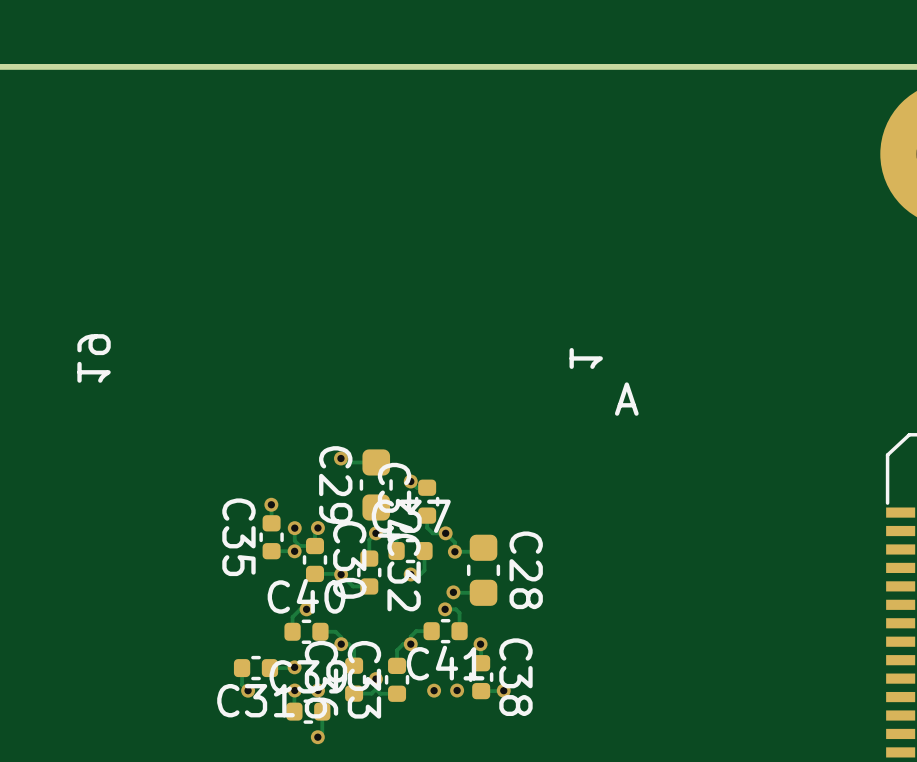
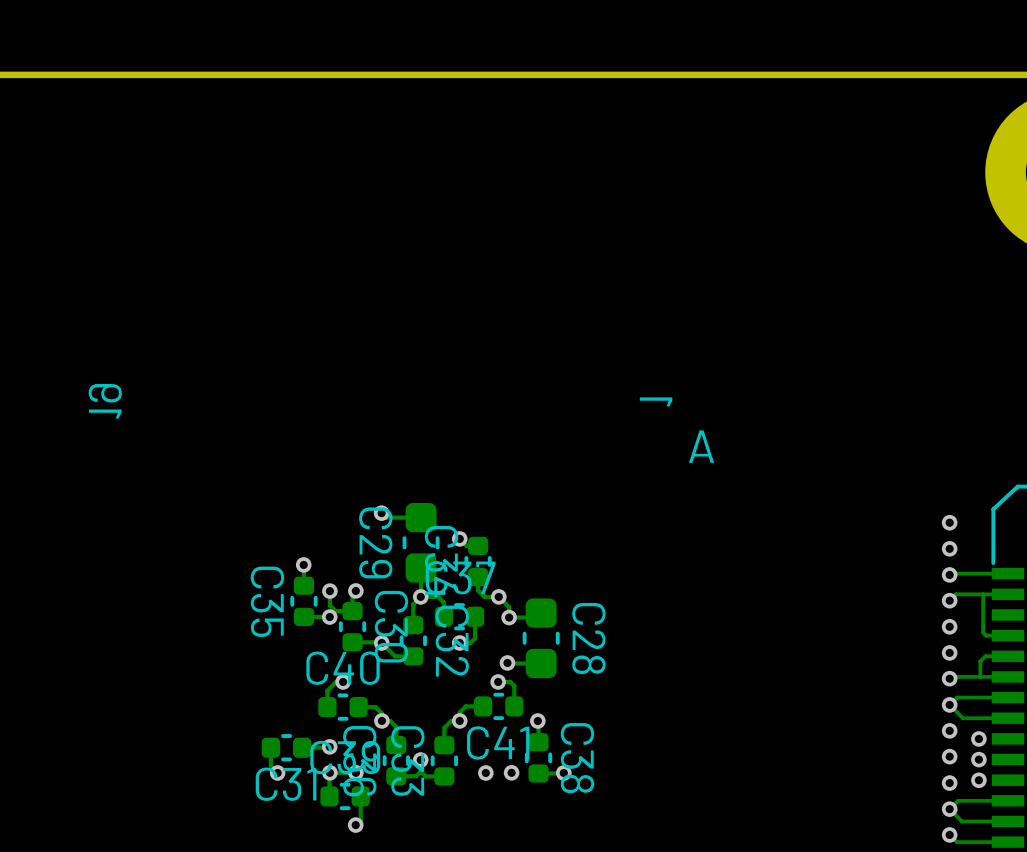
via: none -> (949, 522)
via: none -> (949, 548)
track: none -> (1008, 573) (949, 574)
via: none -> (949, 574)
track: none -> (983, 594) (983, 632) (986, 635) (1008, 635)
track: none -> (1008, 594) (956, 594) (949, 600)
via: none -> (949, 600)
via: none -> (949, 626)
via: none -> (949, 652)
track: none -> (1008, 656) (985, 656) (980, 661) (980, 676)
track: none -> (1008, 676) (951, 676) (949, 678)
via: none -> (949, 678)
track: none -> (1008, 697) (957, 697) (949, 704) (962, 718) (1008, 718)
via: none -> (949, 704)
via: none -> (949, 730)
via: none -> (978, 738)
via: none -> (949, 756)
via: none -> (978, 759)
via: none -> (978, 780)
via: none -> (949, 783)
track: none -> (1008, 800) (958, 800) (949, 809) (961, 821) (1008, 821)
via: none -> (949, 809)
track: none -> (949, 834) (956, 842) (1008, 842)
via: none -> (949, 834)

